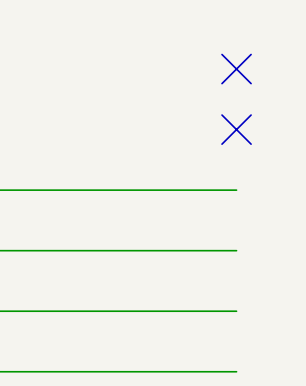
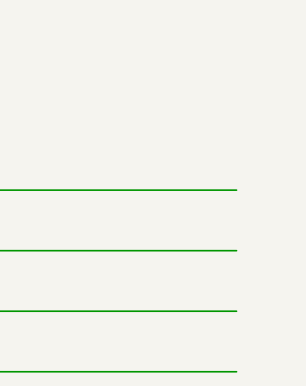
no-connect mark: (236, 69) -> none
no-connect mark: (236, 129) -> none

